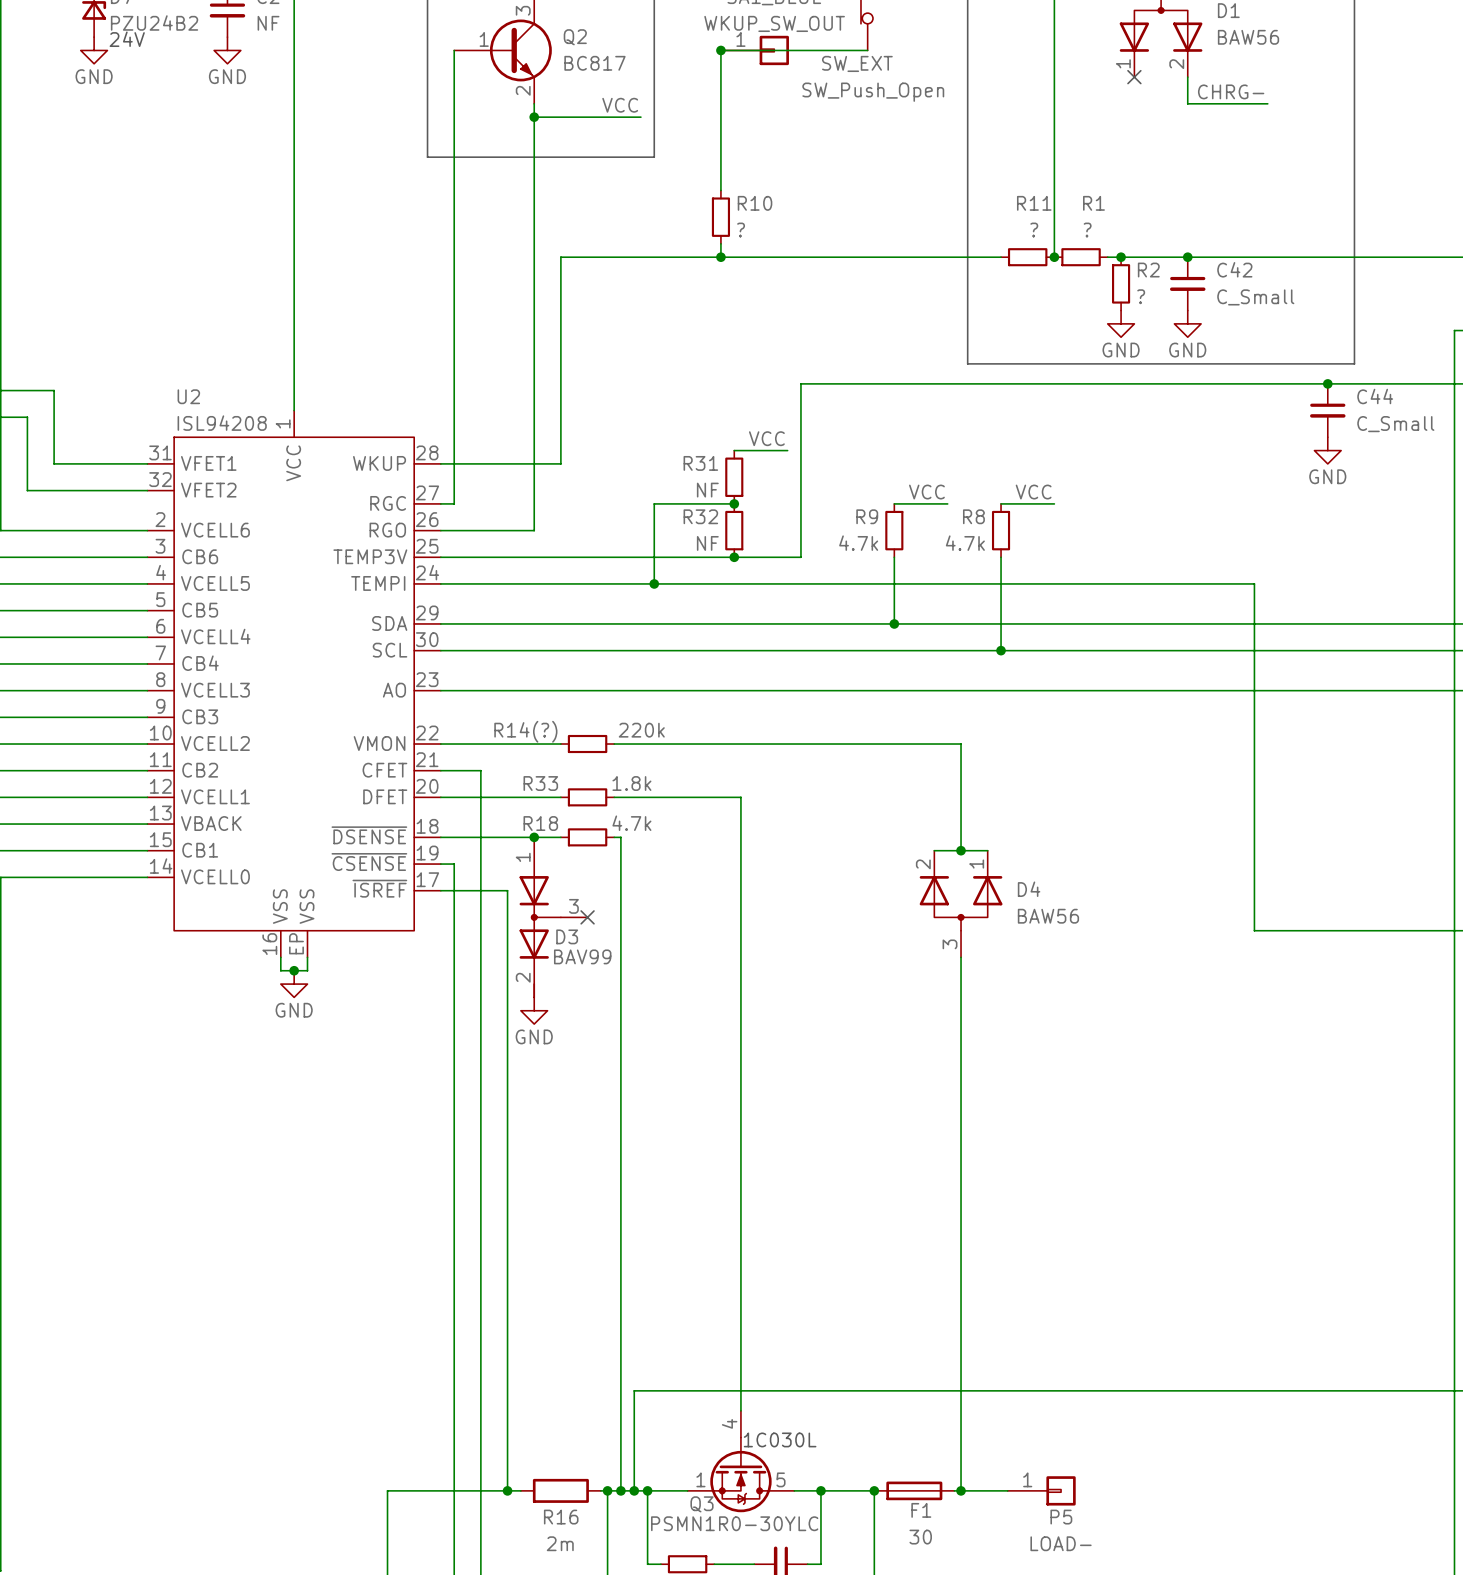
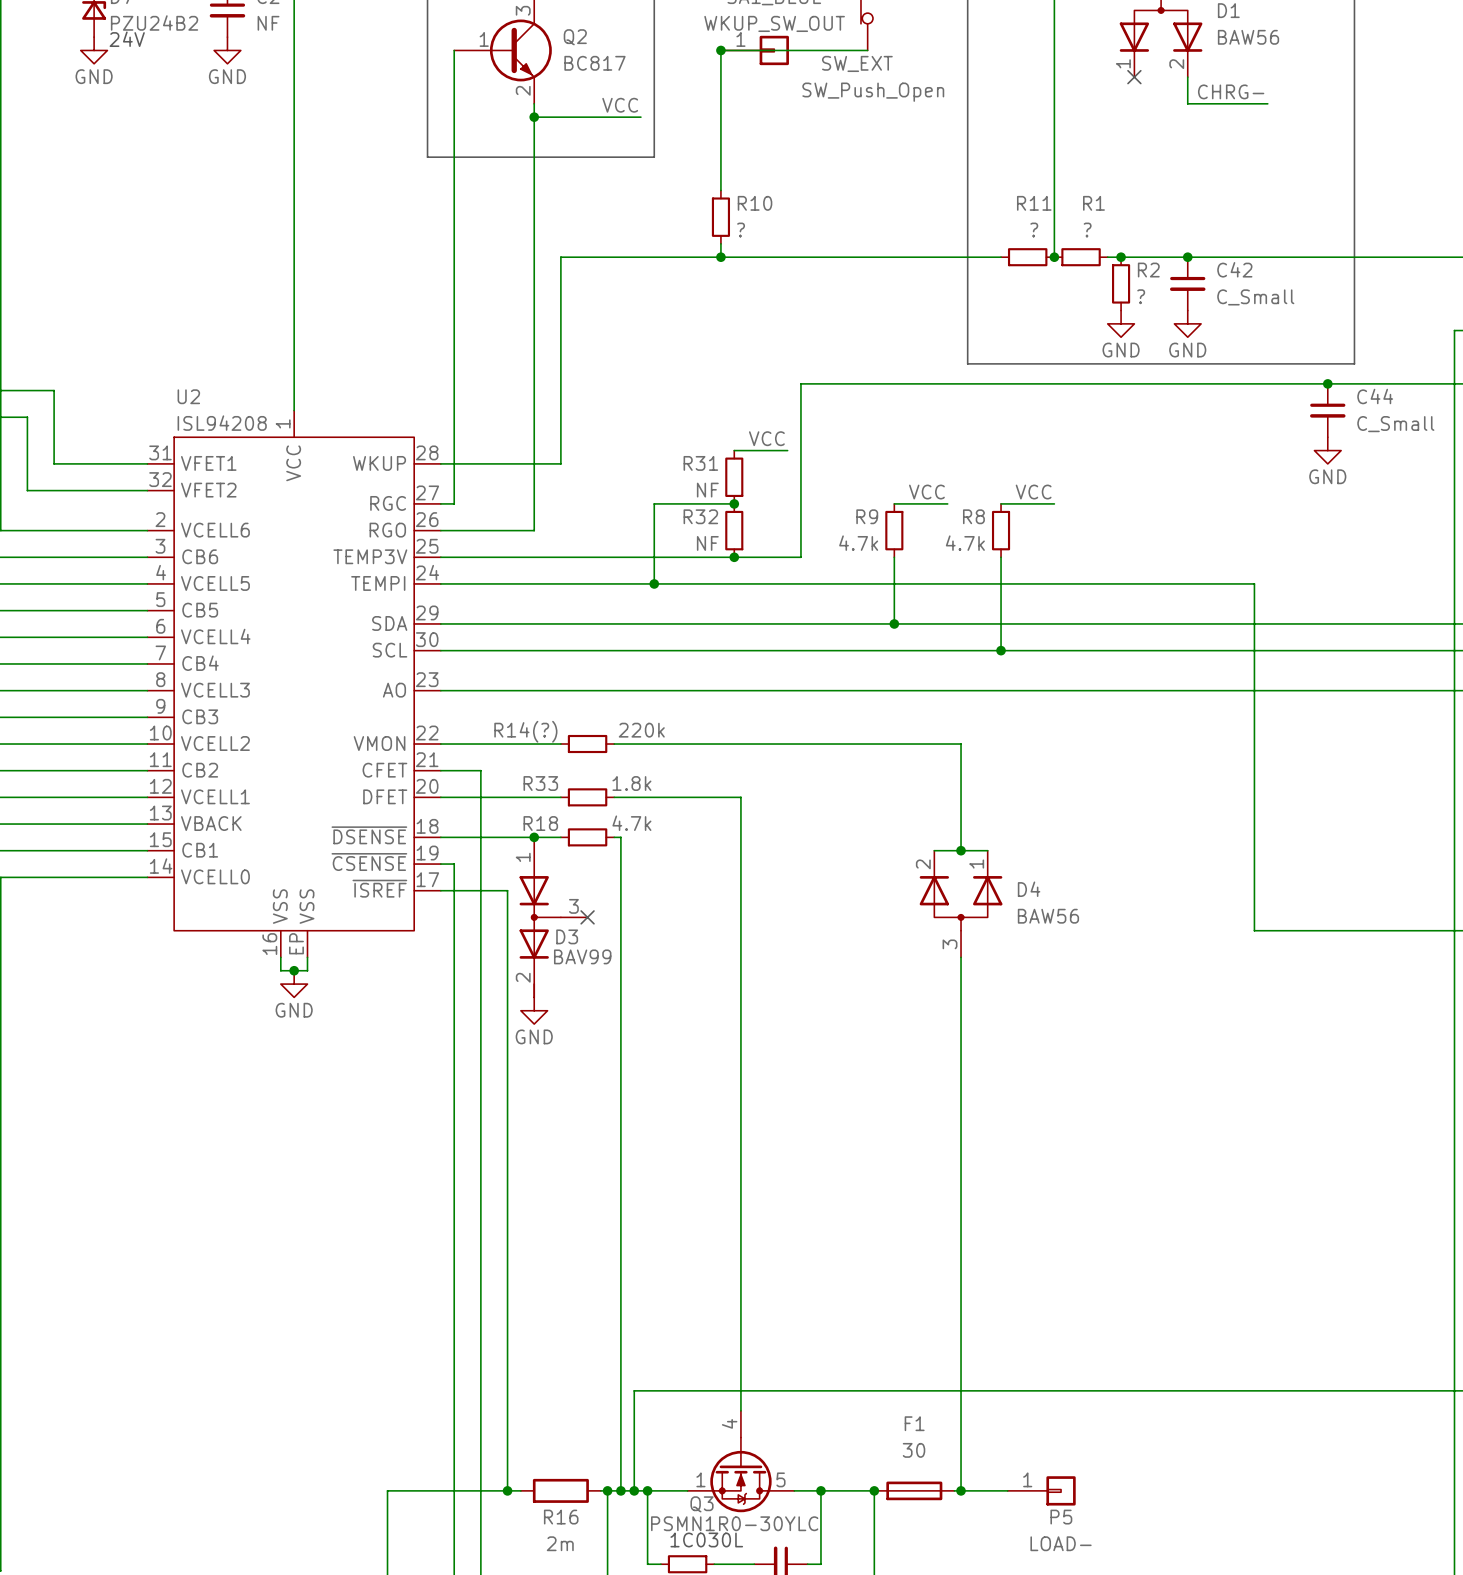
text position: 1C030L (780, 1439) -> 1C030L (706, 1539)
F1 name position: F1 (921, 1510) -> F1 (914, 1423)
F1 value position: 30 (920, 1537) -> 30 (914, 1450)

